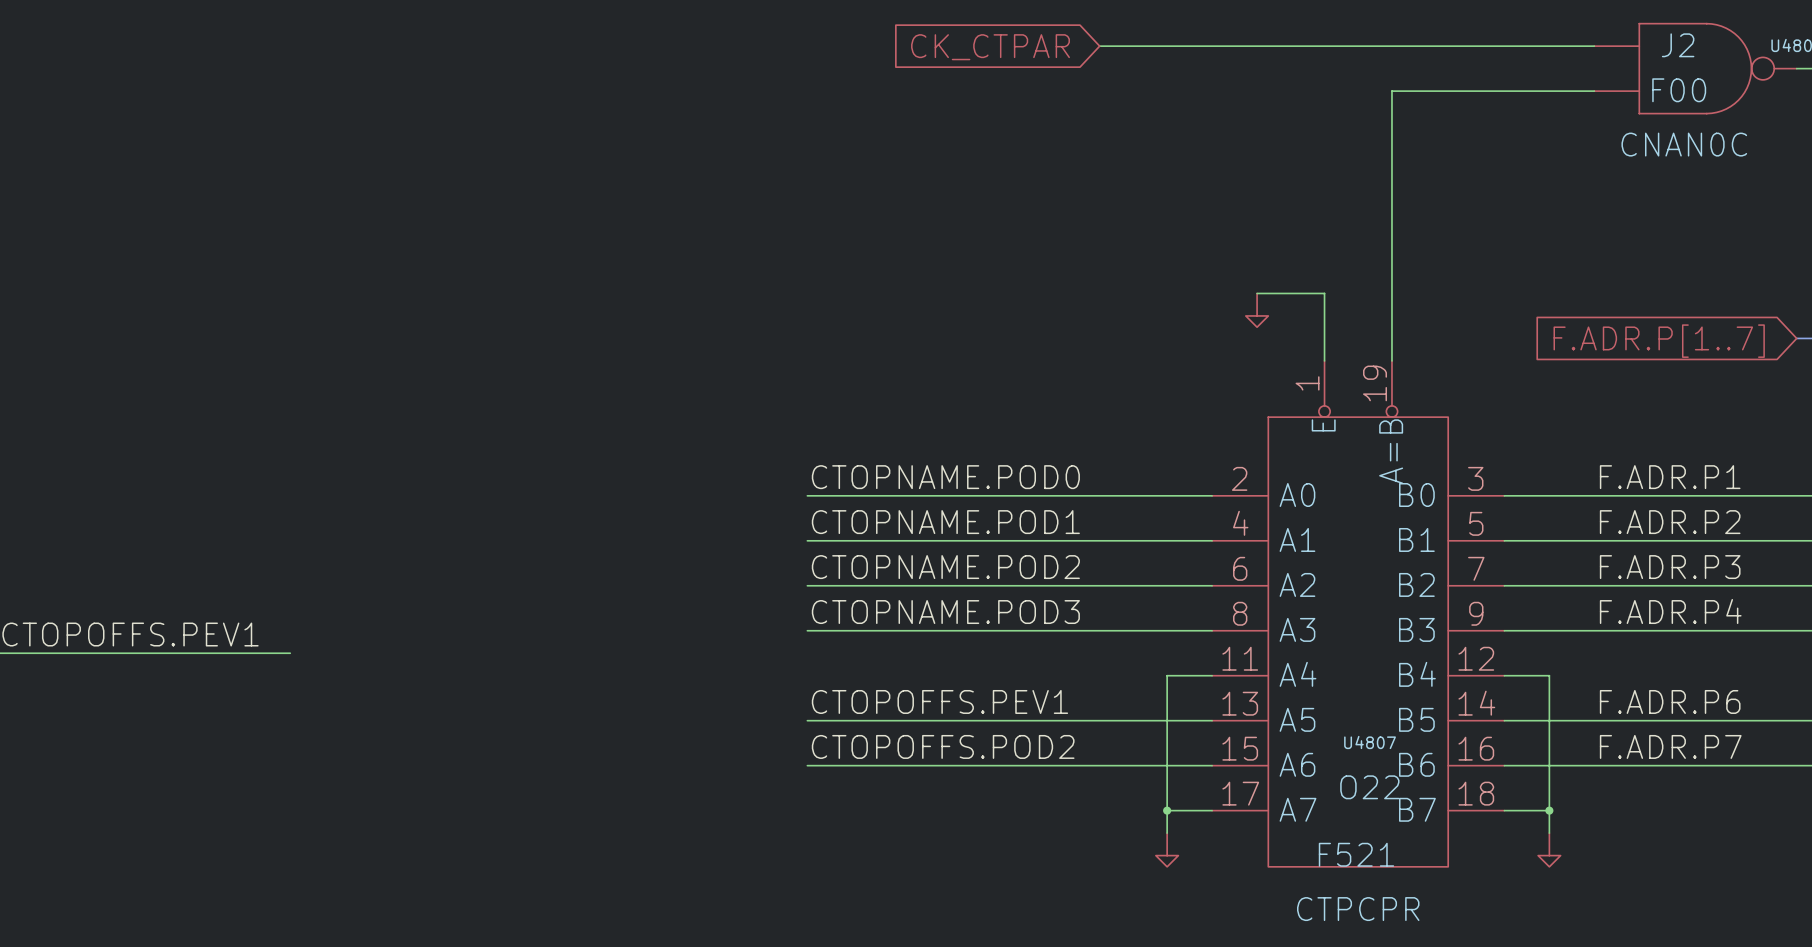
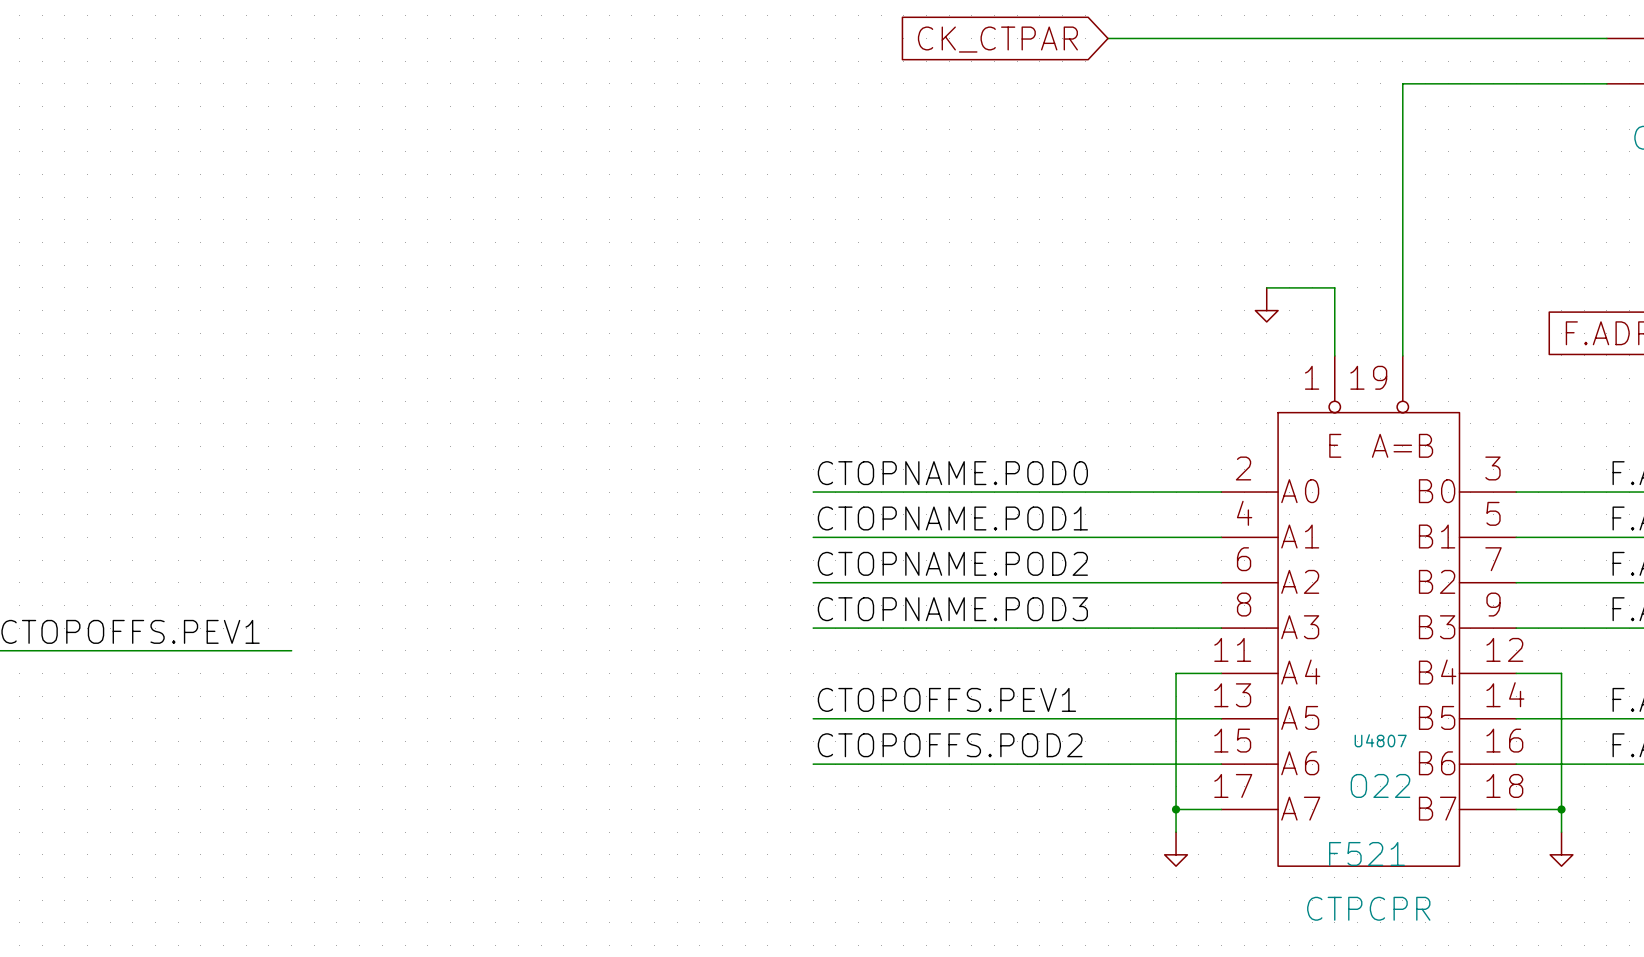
U4807 symbol: [1212, 360, 1505, 867] -> [1221, 355, 1517, 867]

